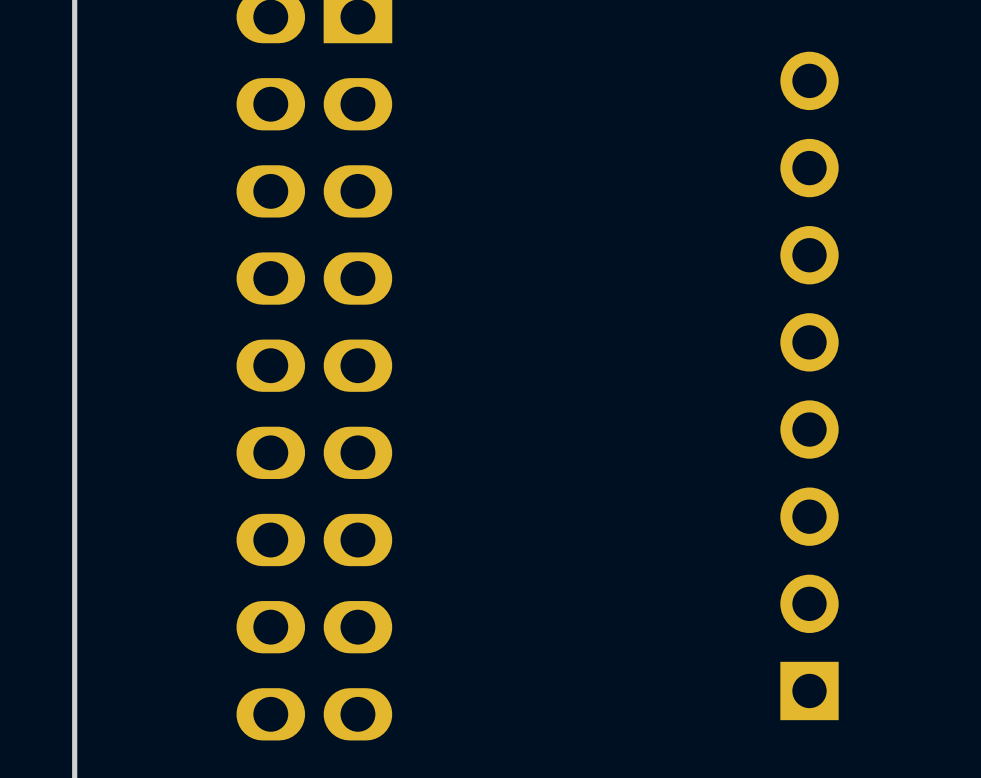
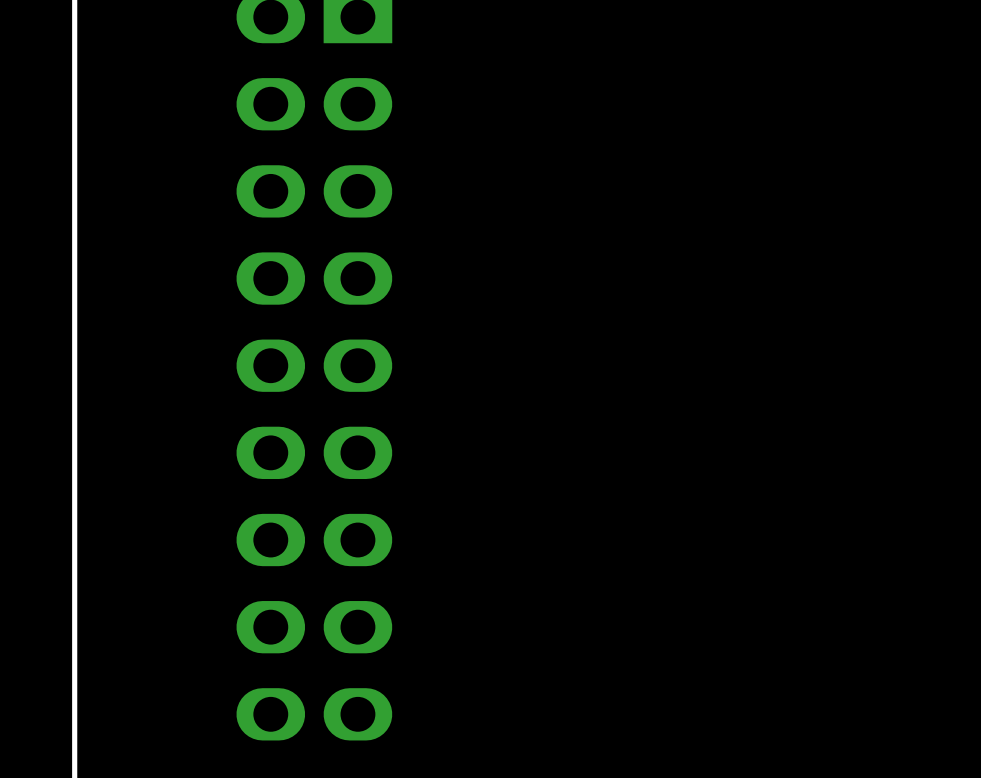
part: (809, 385) -> none

